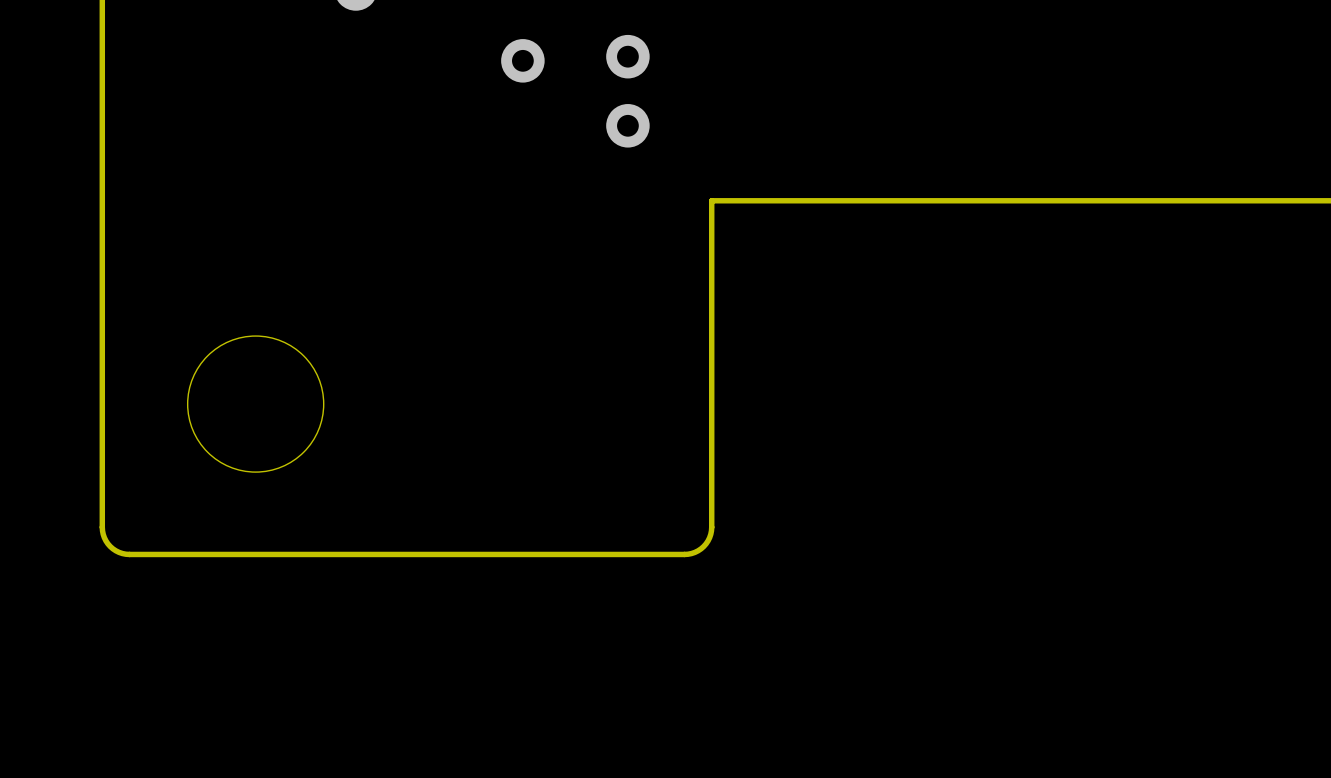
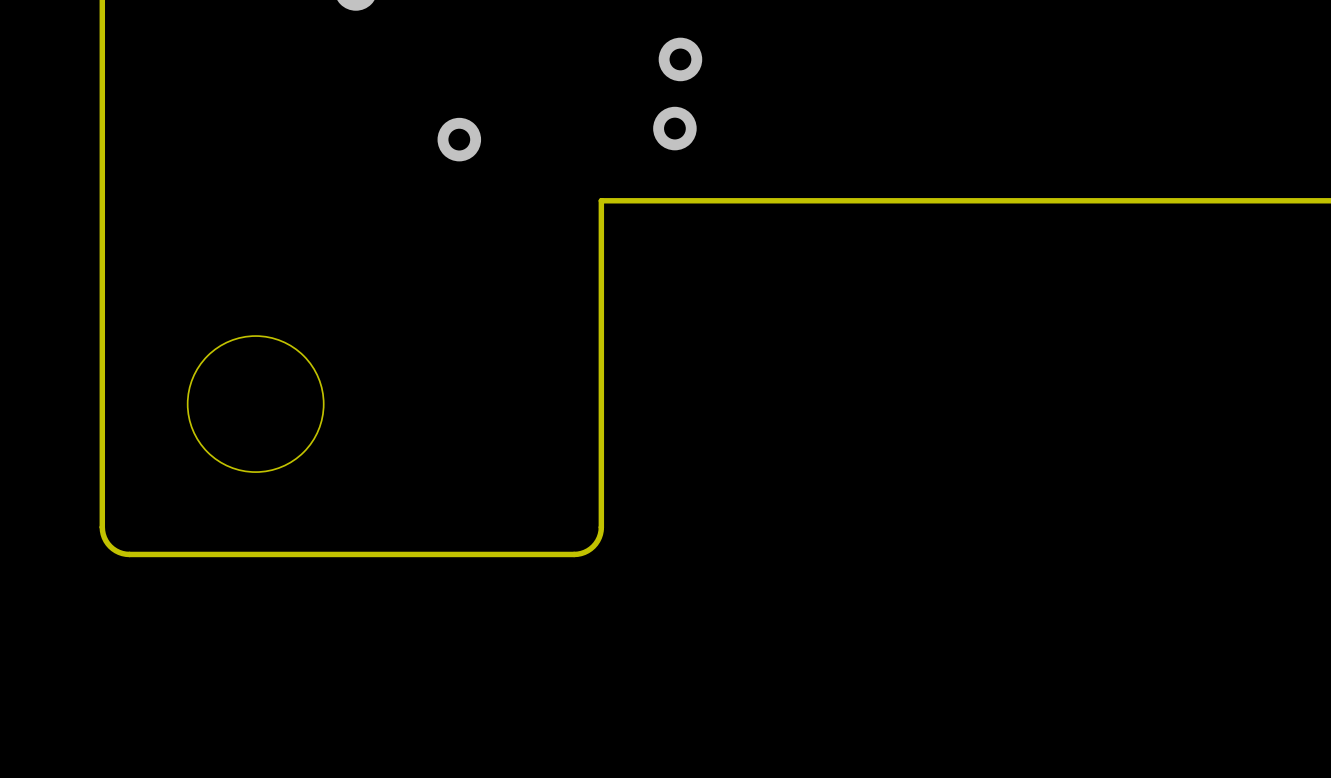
via: (627, 56) -> none
via: none -> (680, 59)
via: (522, 60) -> none
via: (627, 125) -> none
via: none -> (674, 128)
via: none -> (459, 139)
board edge: (711, 200) (711, 527) (709, 537) (701, 548) (688, 554) (574, 554) -> (711, 200) (601, 200) (601, 530) (593, 546) (584, 552) (574, 554)

